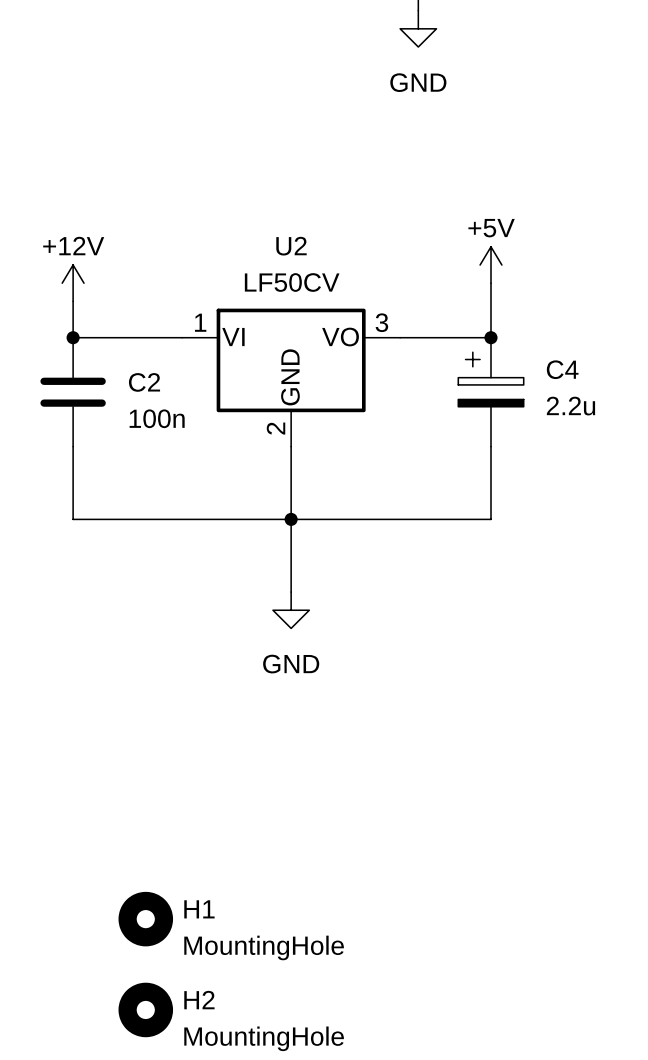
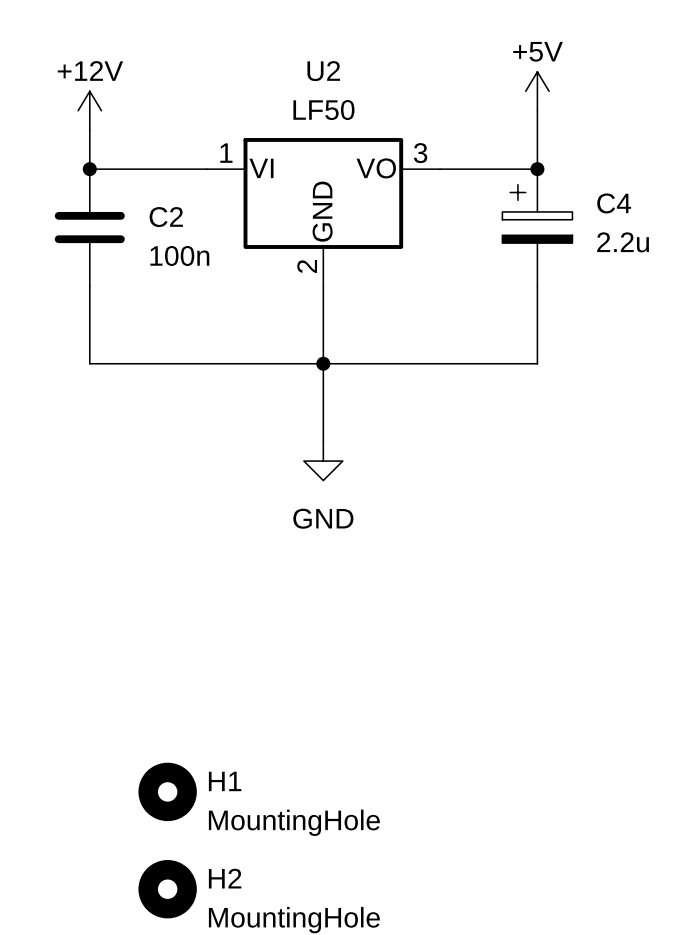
U2 value: LF50CV (292, 282) -> LF50 (323, 110)

